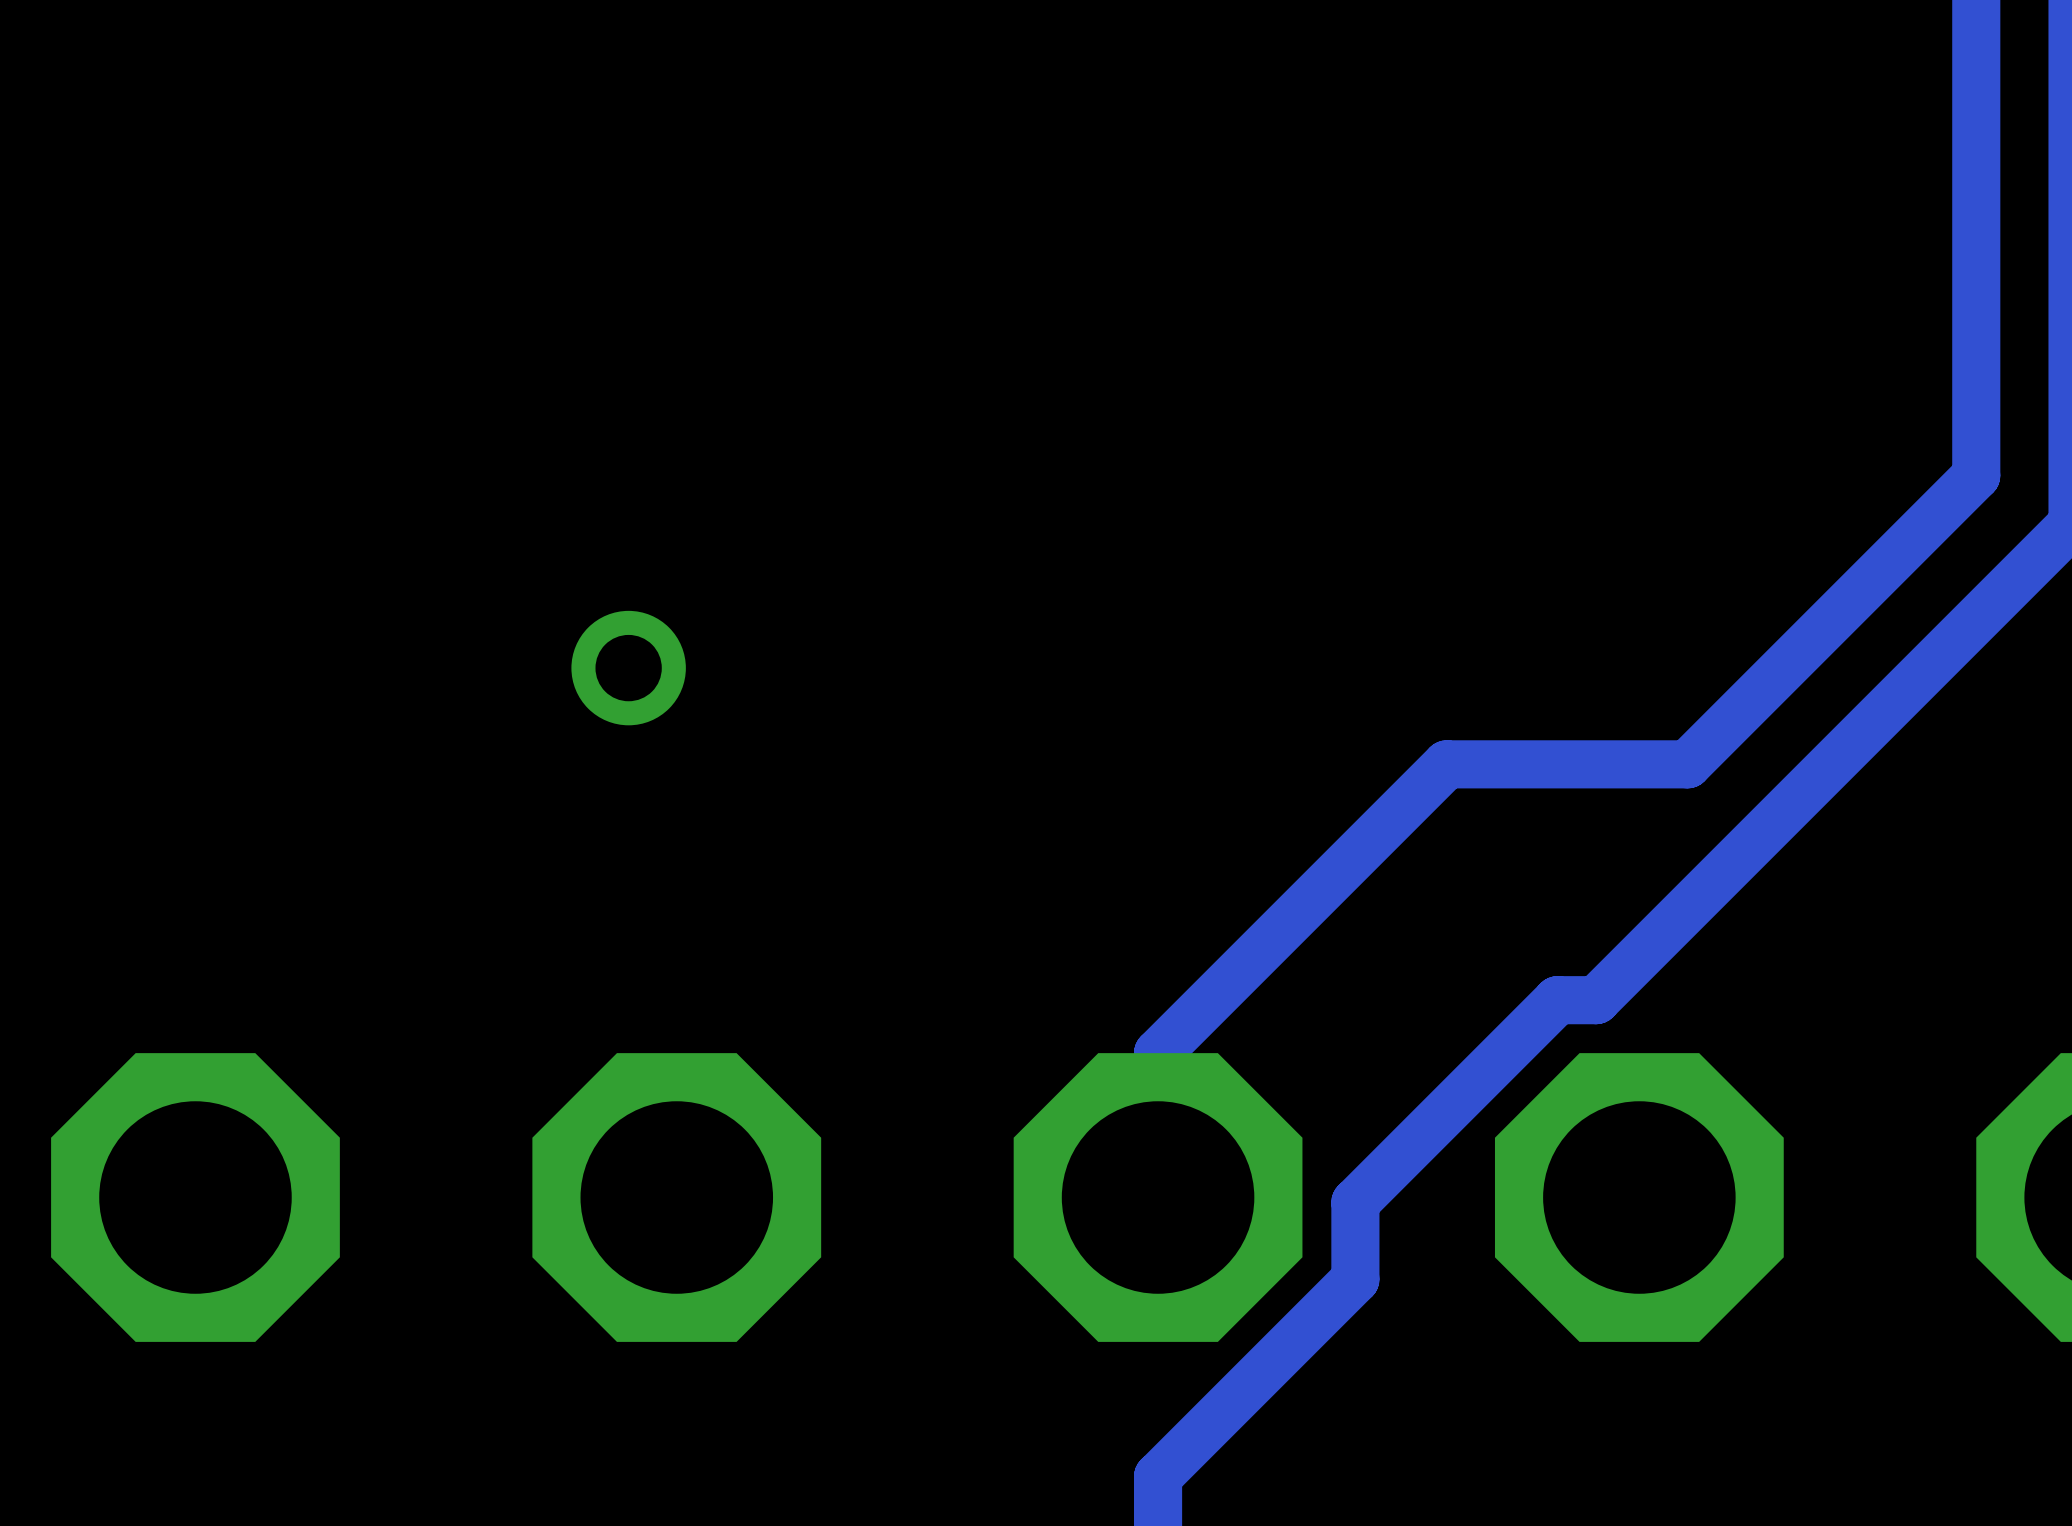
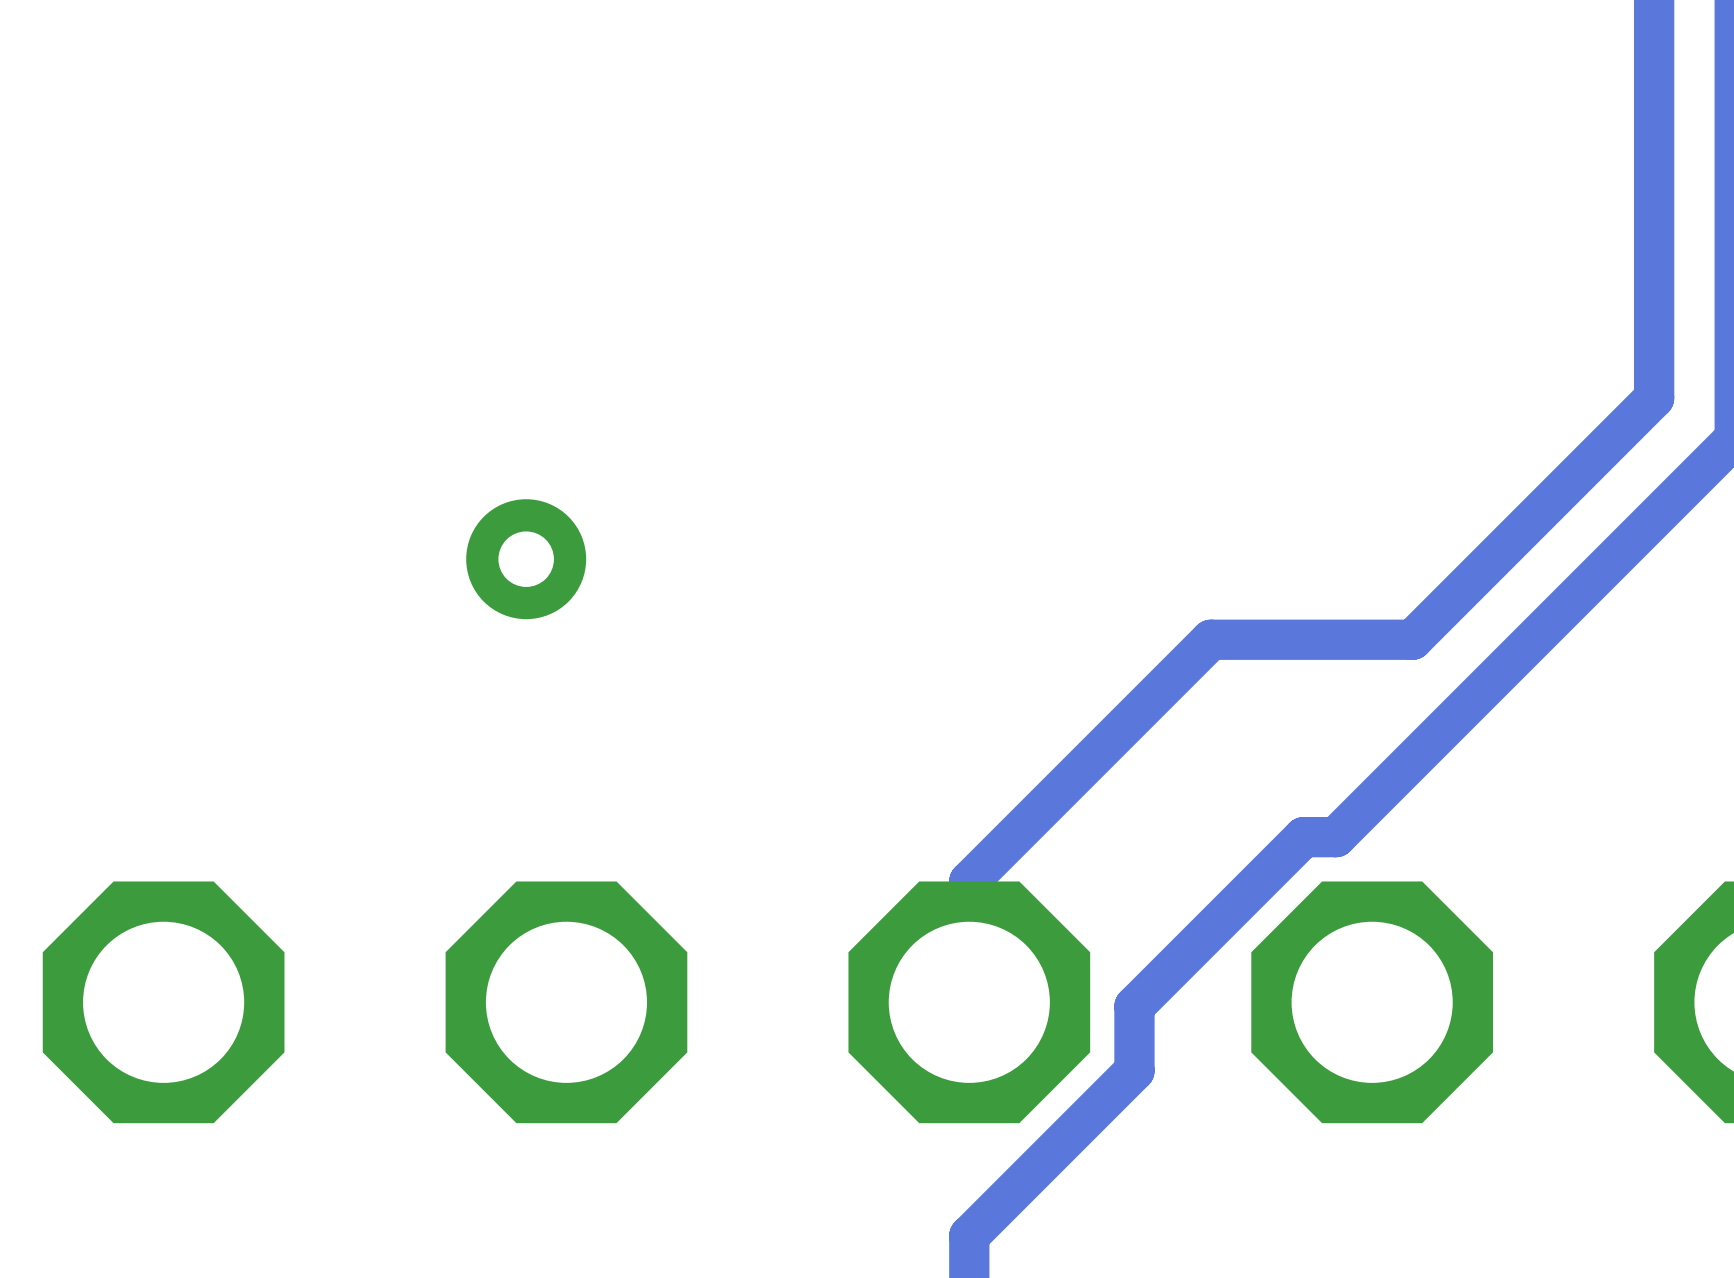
via size: [571, 610, 686, 726] -> [466, 499, 587, 620]

